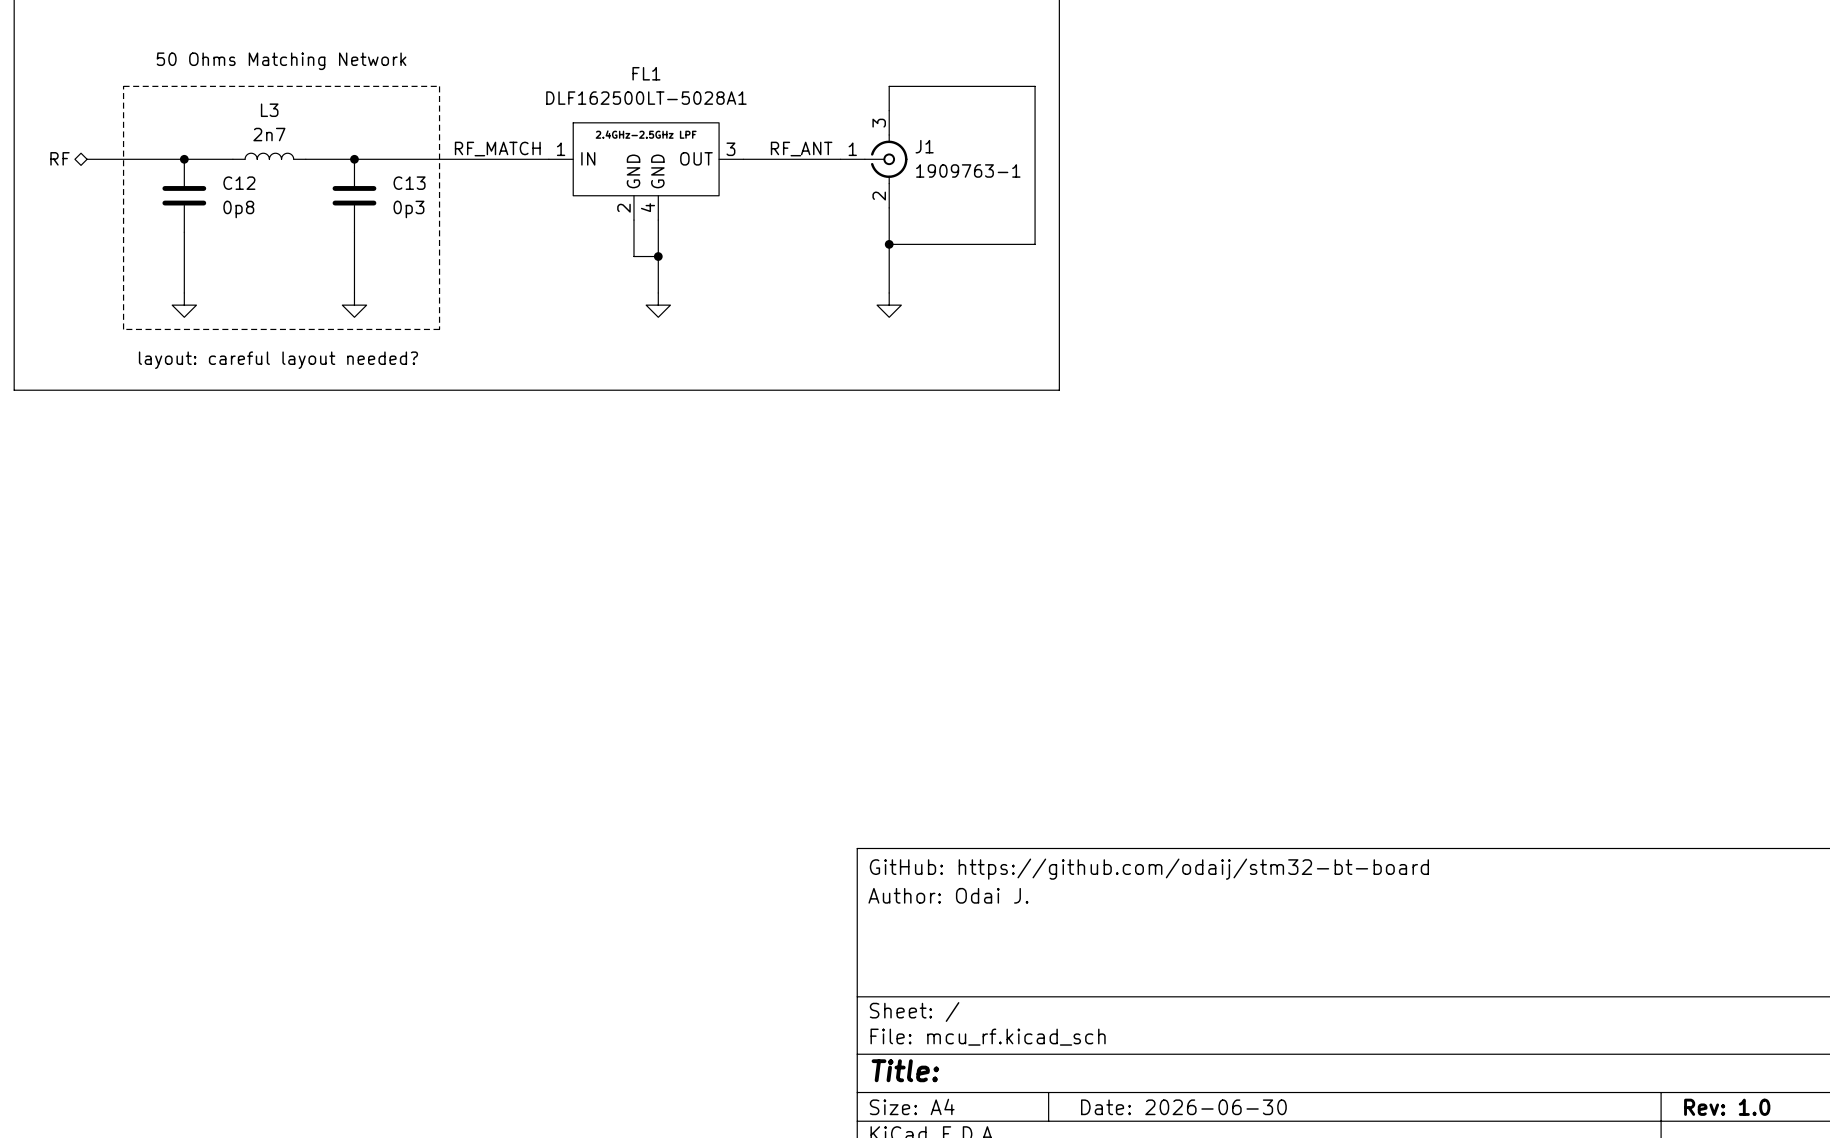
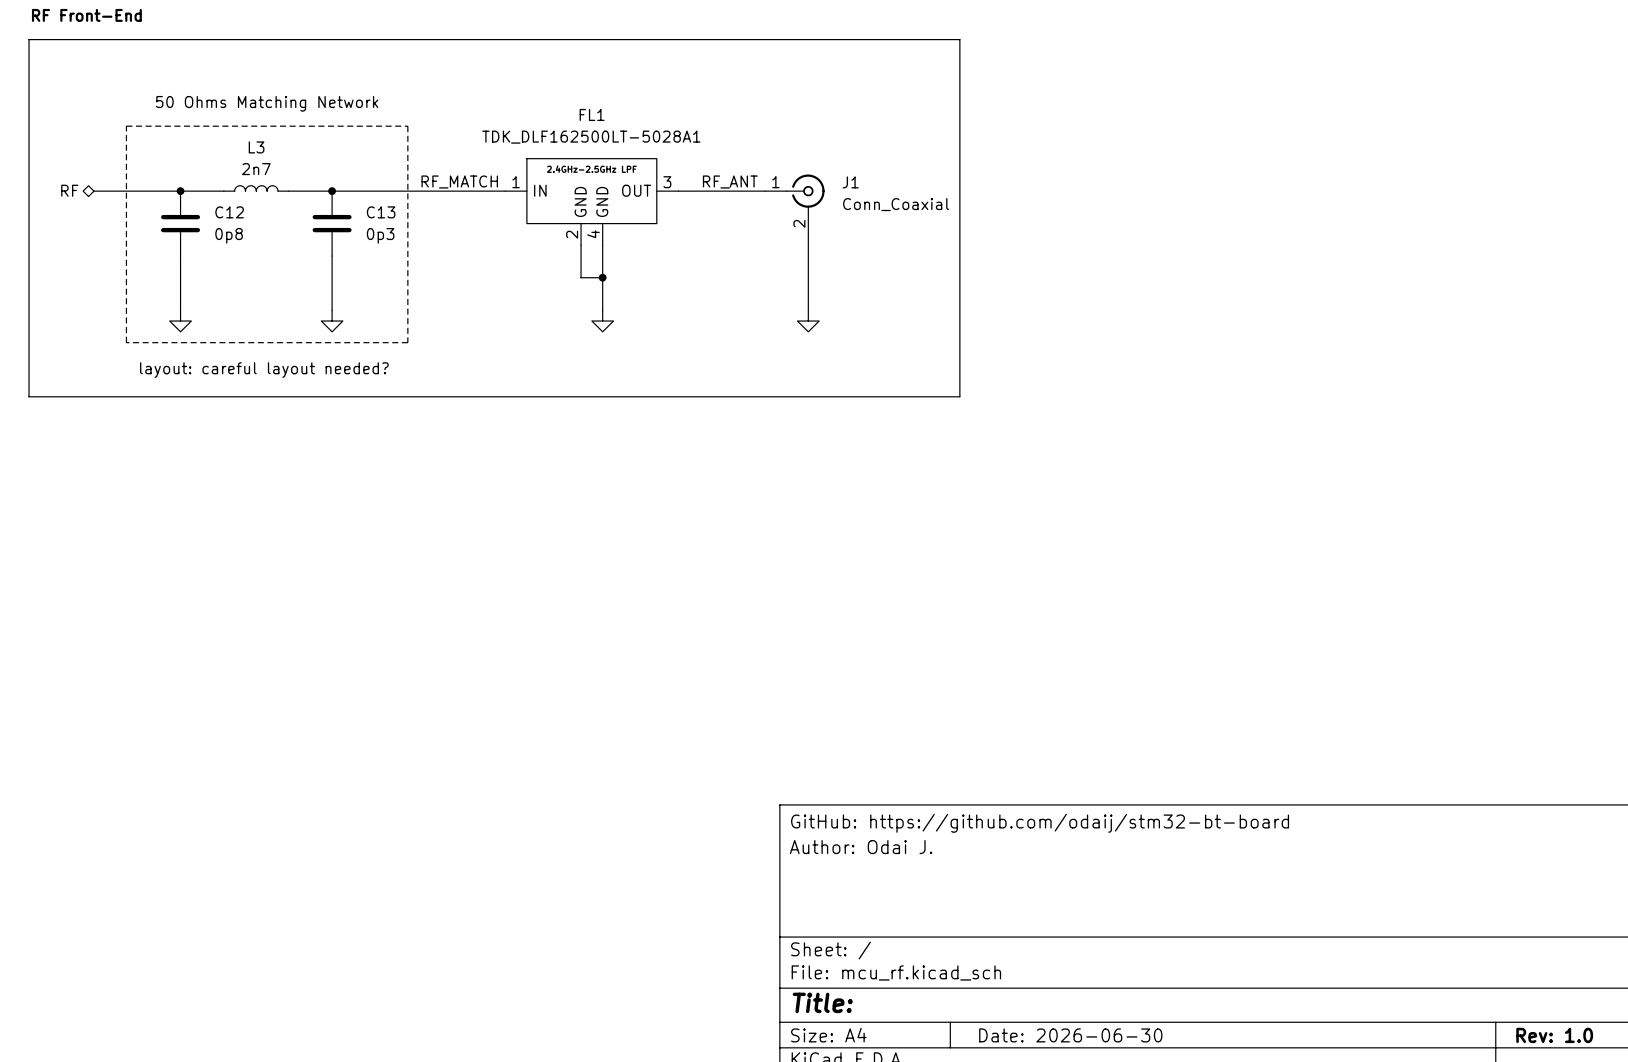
FL1 value: DLF162500LT-5028A1 (646, 98) -> TDK_DLF162500LT-5028A1 (591, 137)
J1 symbol: [840, 110, 908, 208] -> [765, 174, 825, 235]
wire: (889, 110) (889, 86) (1035, 86) (1035, 244) (889, 244) -> none
J1 value: 1909763-1 (968, 170) -> Conn_Coaxial (896, 204)
junction: (889, 244) -> none

